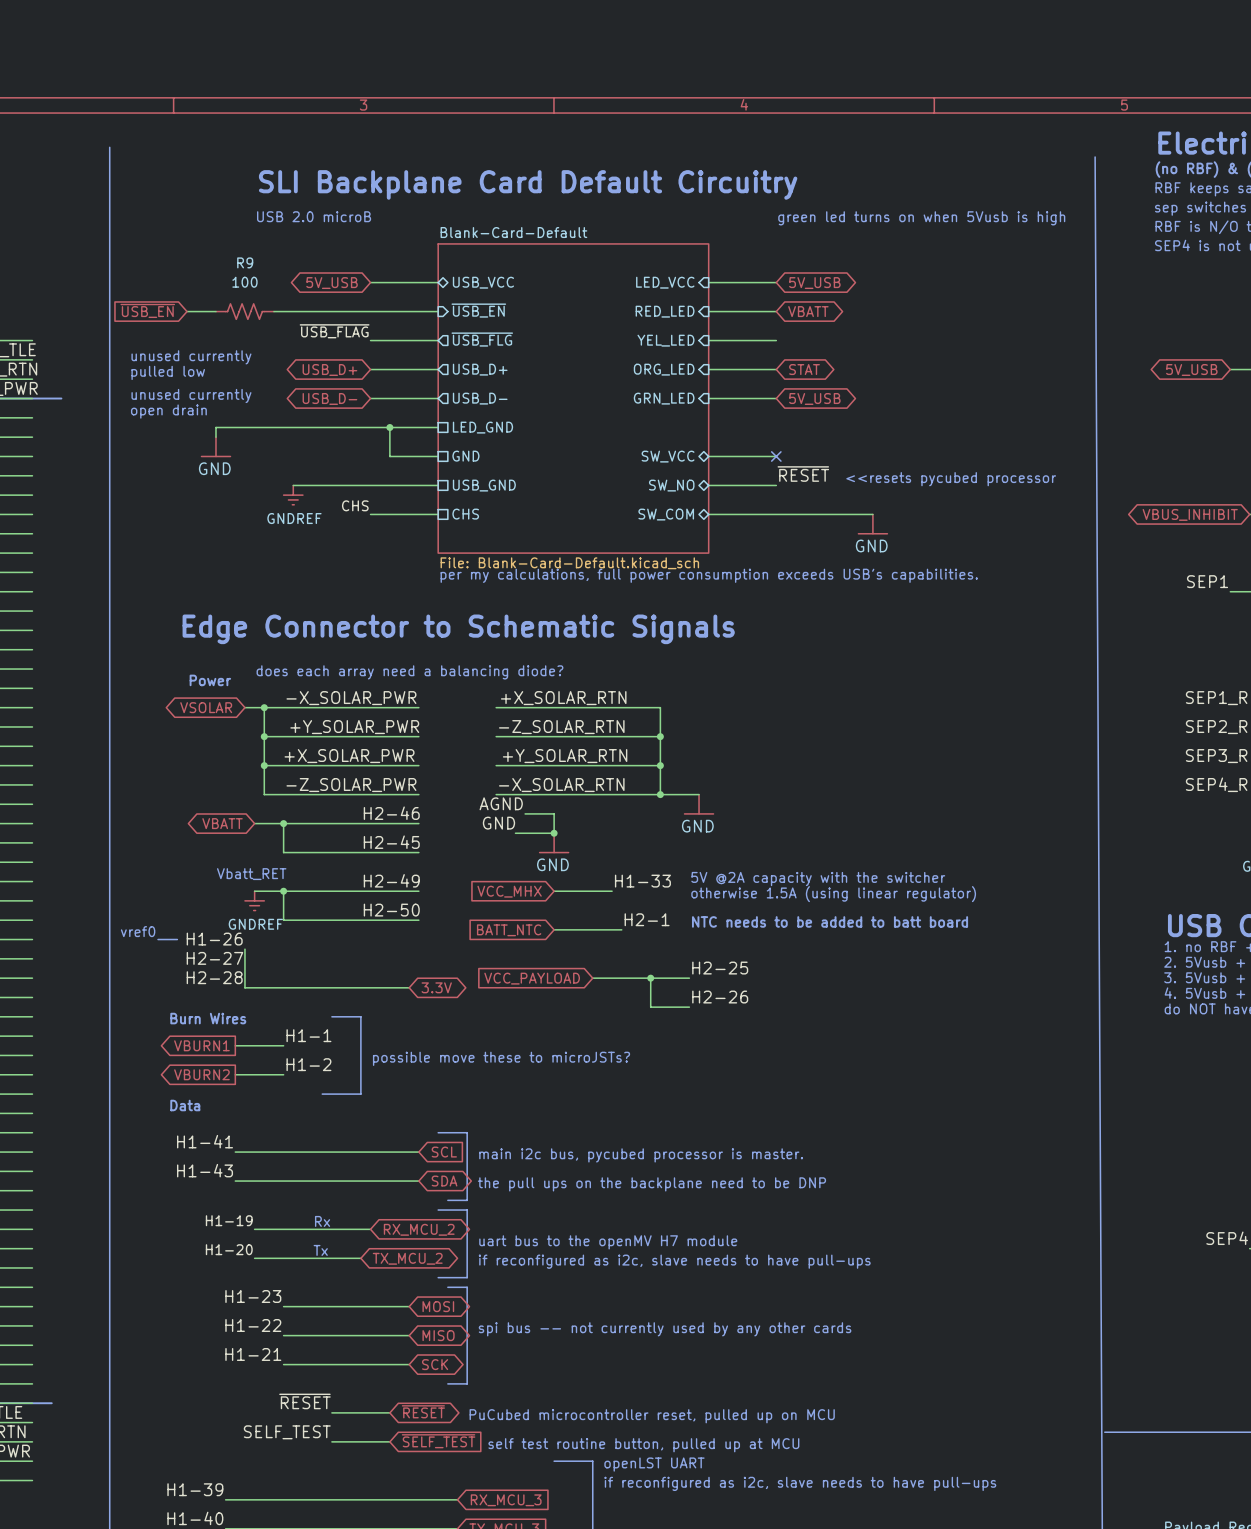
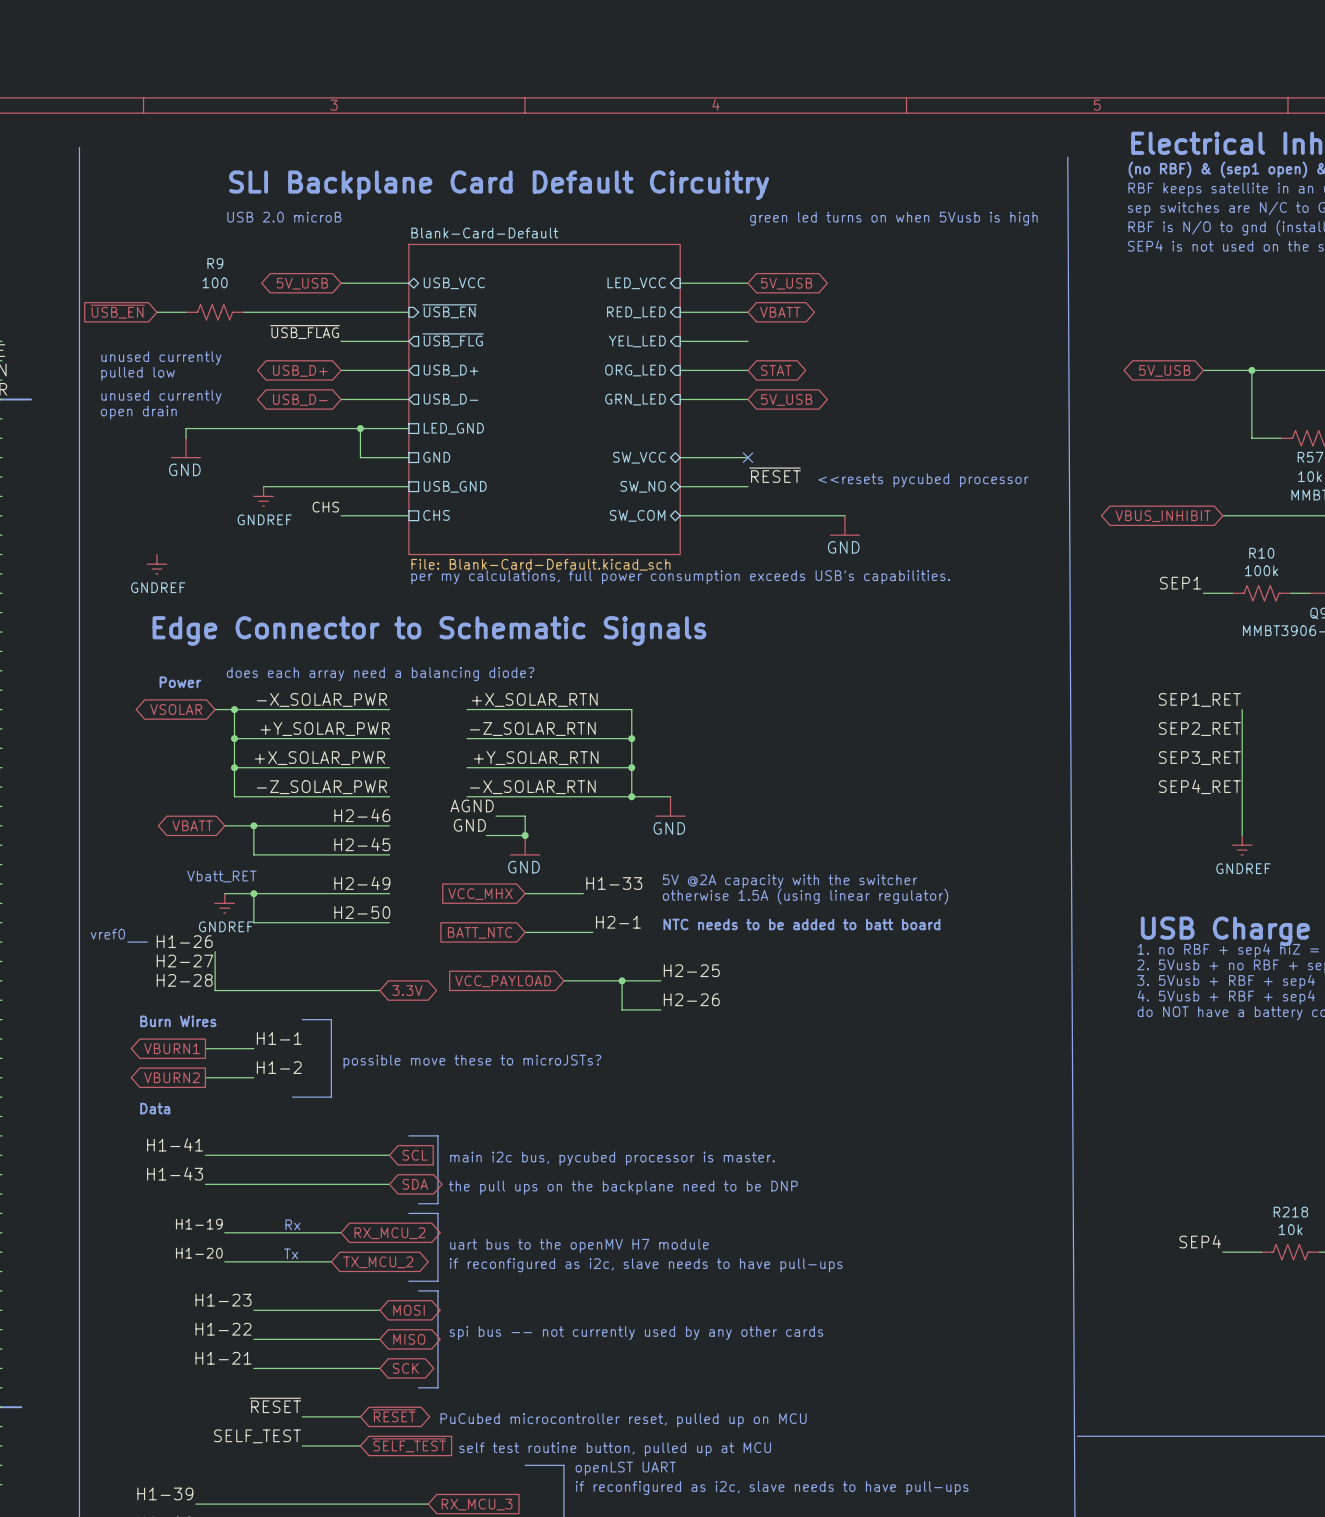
power symbol: none -> GNDREF (156, 564)

